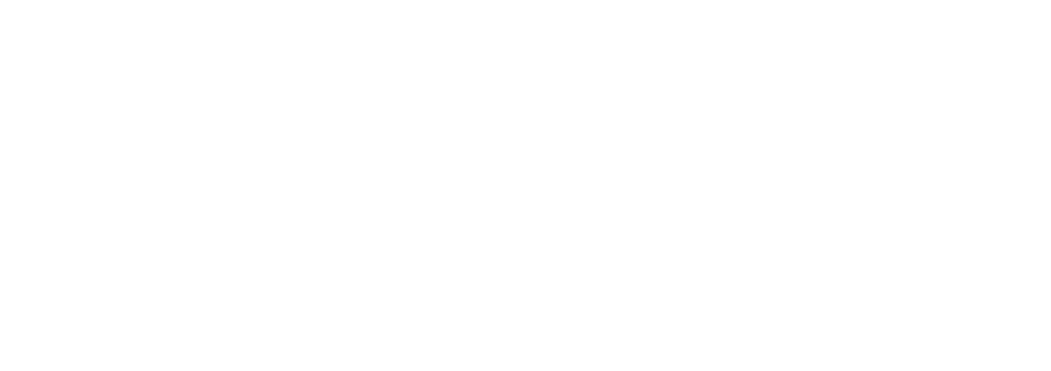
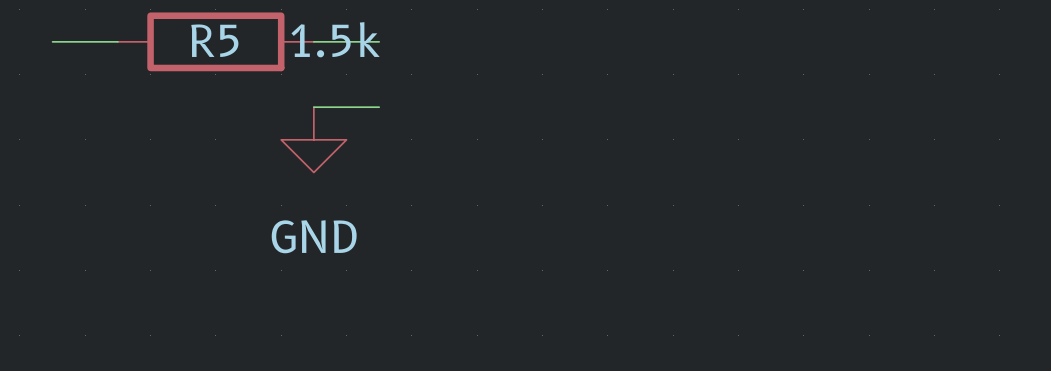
wire: none -> (52, 41) (117, 41)
R5: none -> 1.5k (215, 41)
wire: none -> (313, 41) (379, 41)
wire: none -> (313, 107) (379, 107)
power symbol: none -> GND (313, 139)

